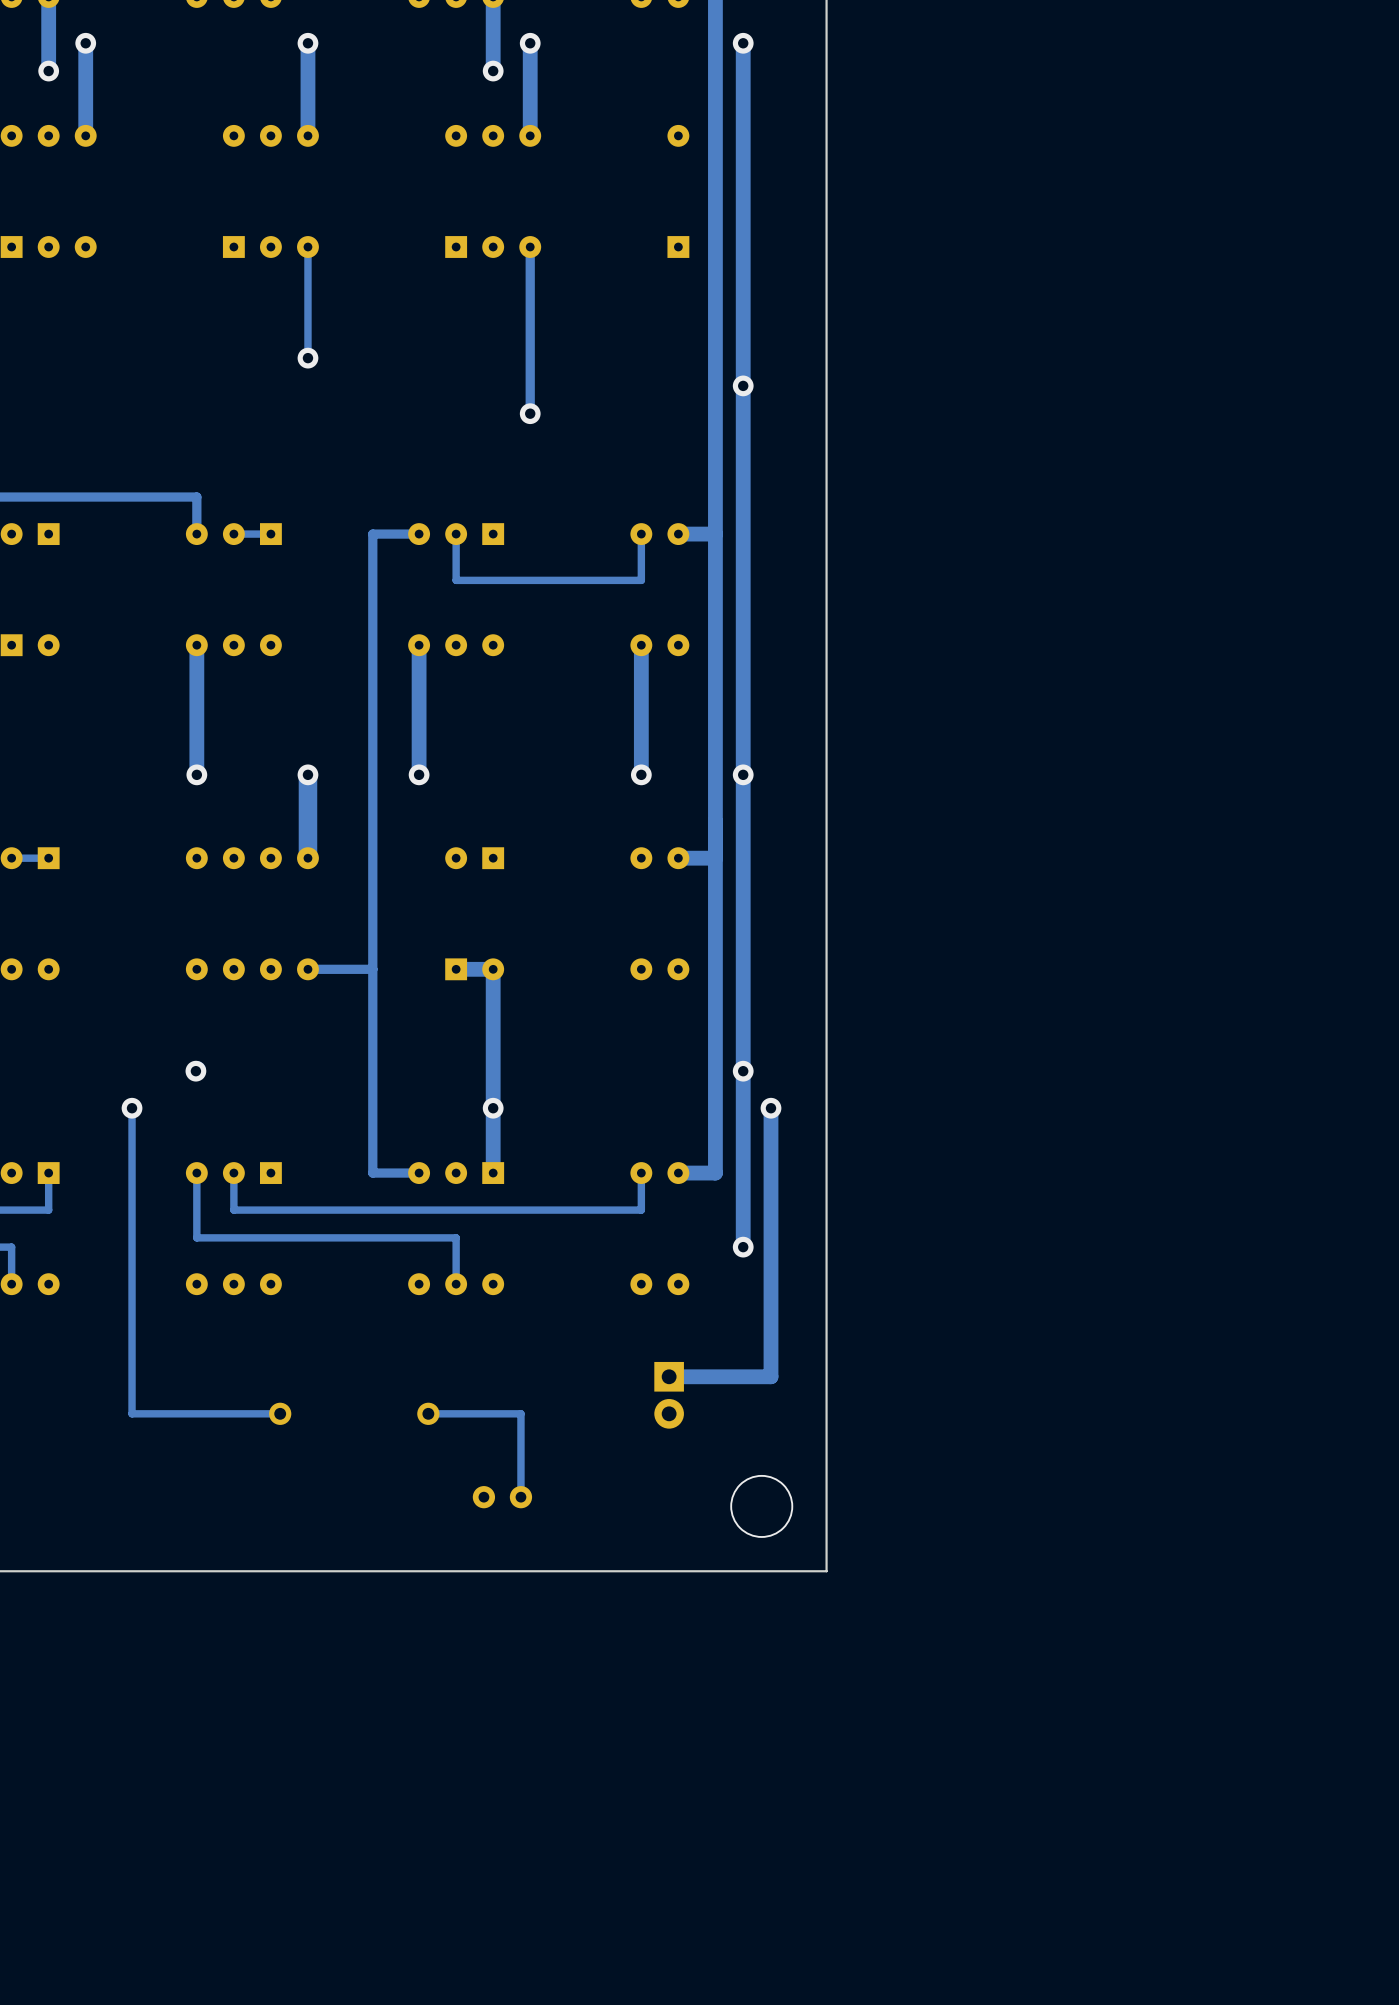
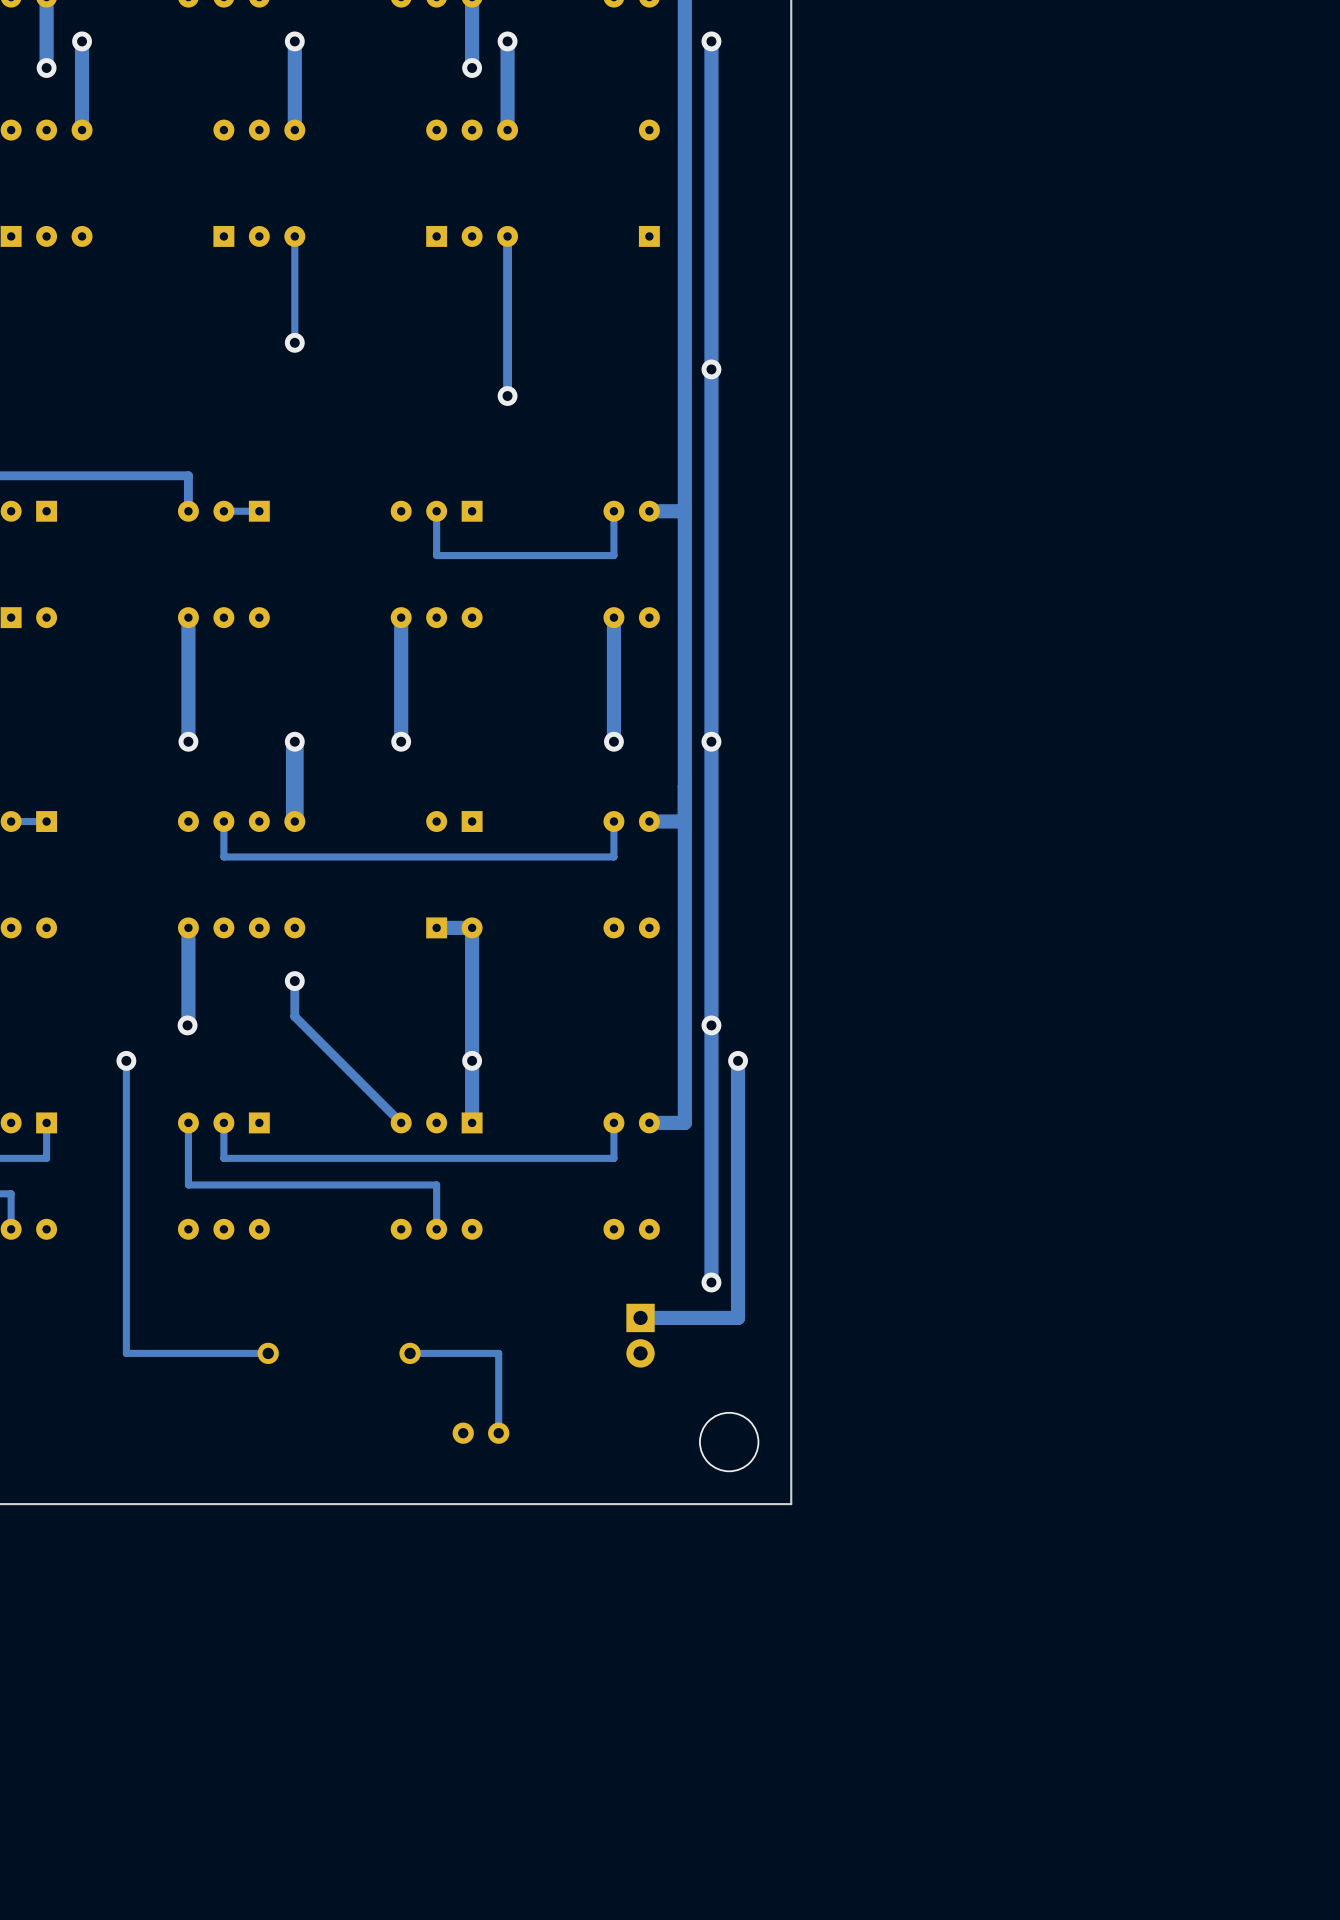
track: (419, 534) (372, 534) (372, 1173) (419, 1173) -> (294, 981) (294, 1016) (401, 1122)
track: none -> (613, 821) (613, 856) (223, 856) (223, 821)
track: none -> (188, 927) (188, 1024)
track: (372, 969) (307, 969) -> none
via: none -> (294, 981)
track: none -> (711, 1193) (711, 1282)
via: (743, 1247) -> none
via: none -> (711, 1282)

